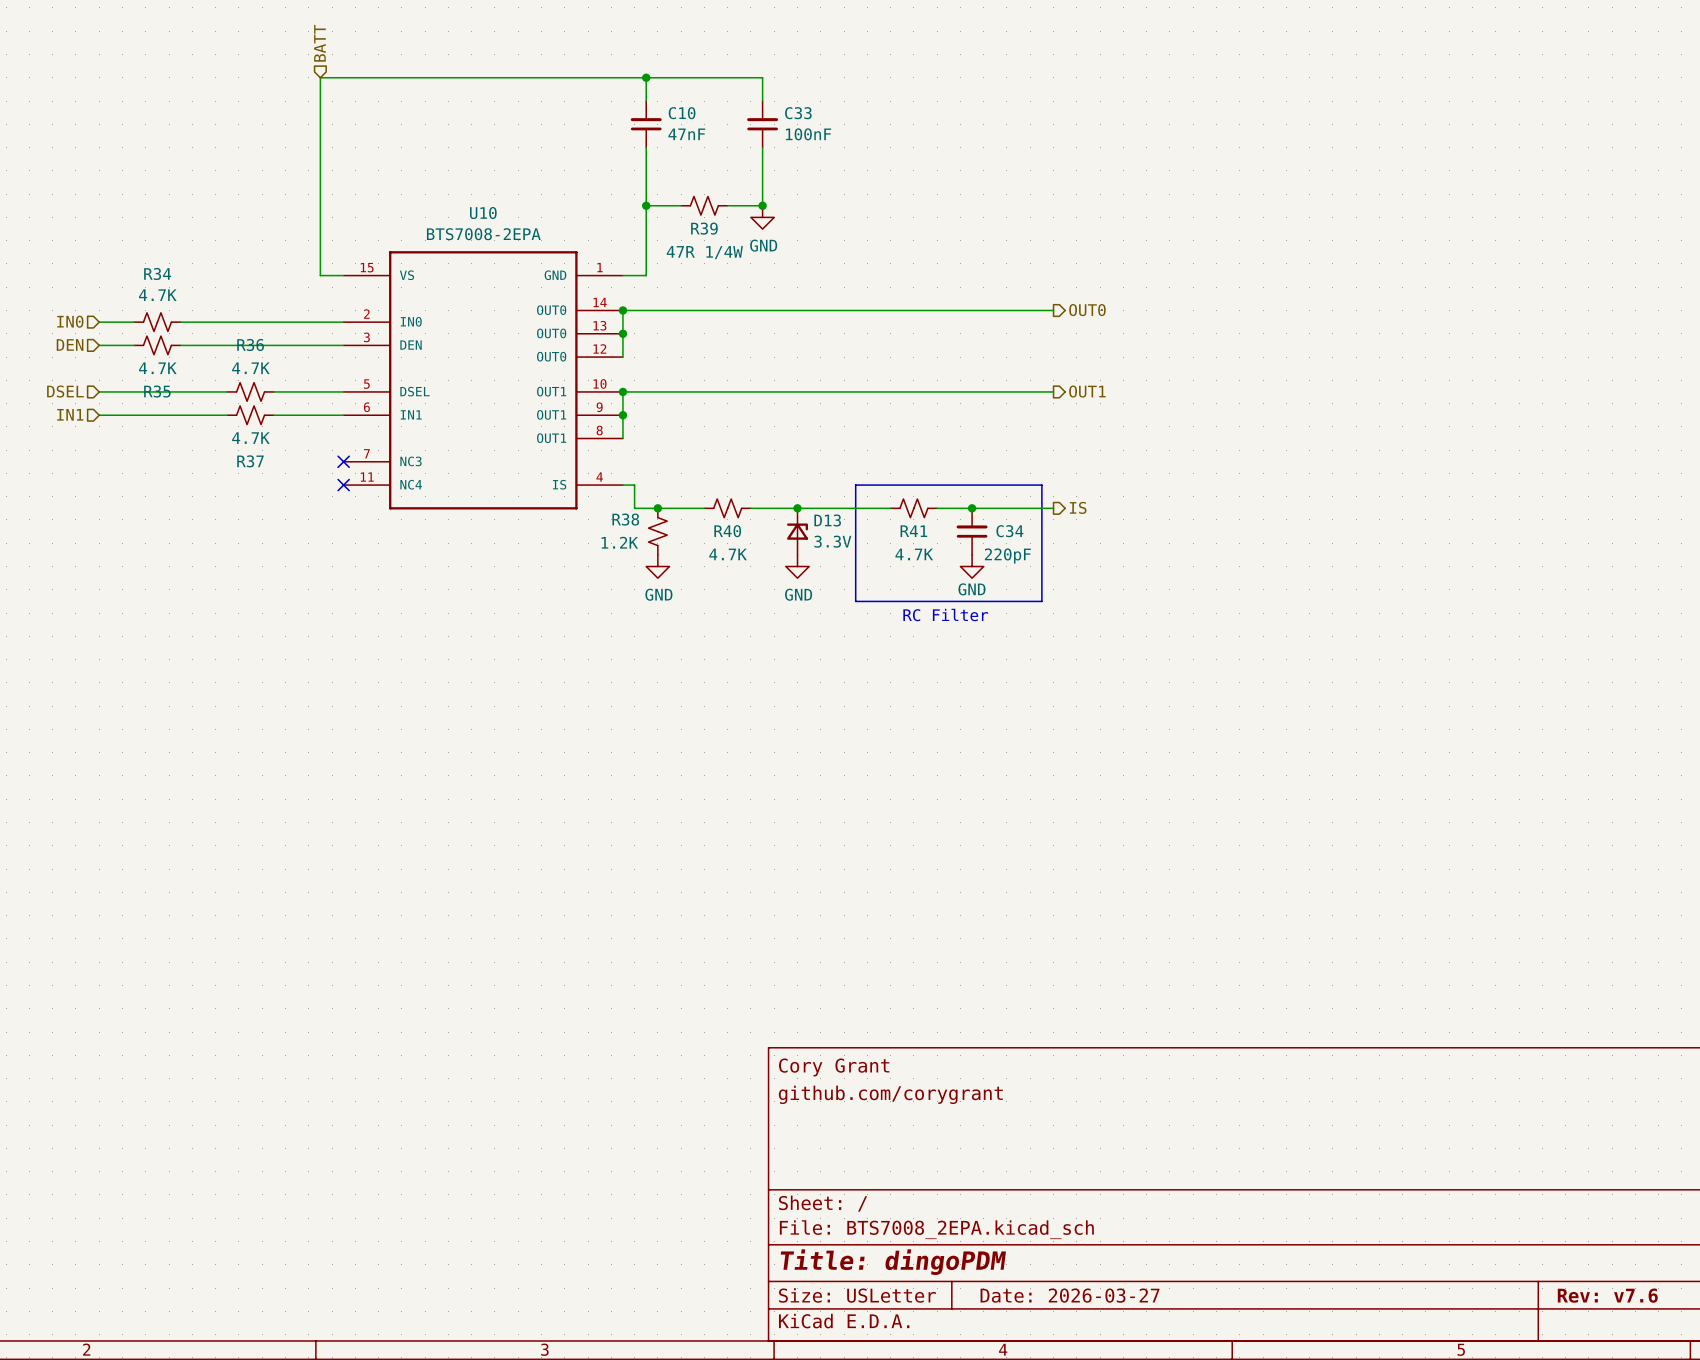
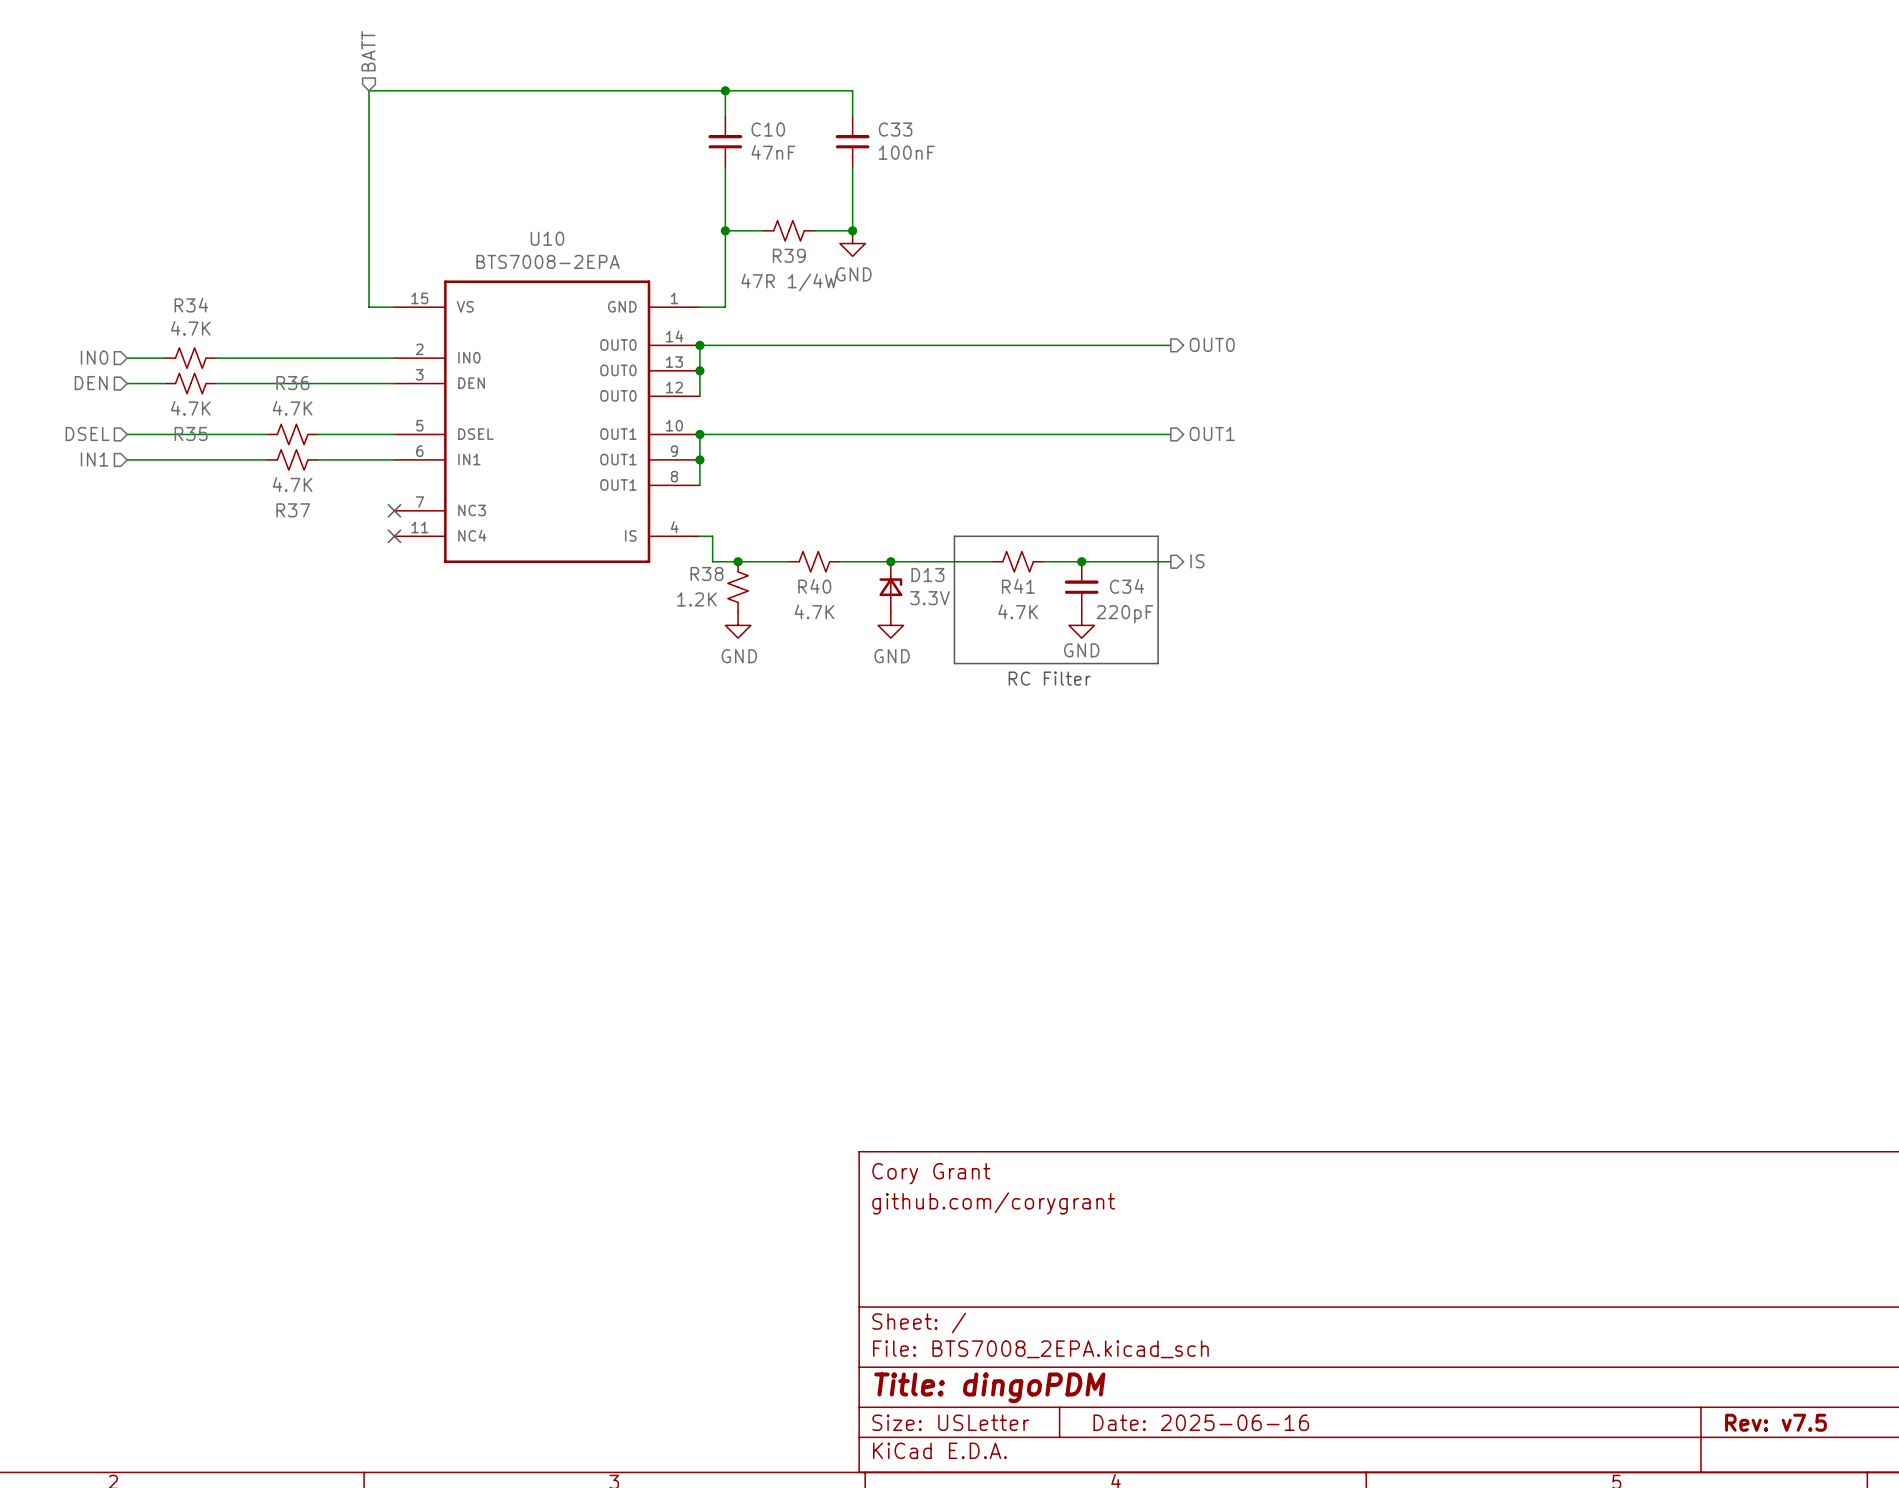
title block: Date: 2026-03-27 (1070, 1295) -> Date: 2025-06-16 (1201, 1422)
title block: Rev: v7.6 (1607, 1295) -> Rev: v7.5 (1775, 1422)

